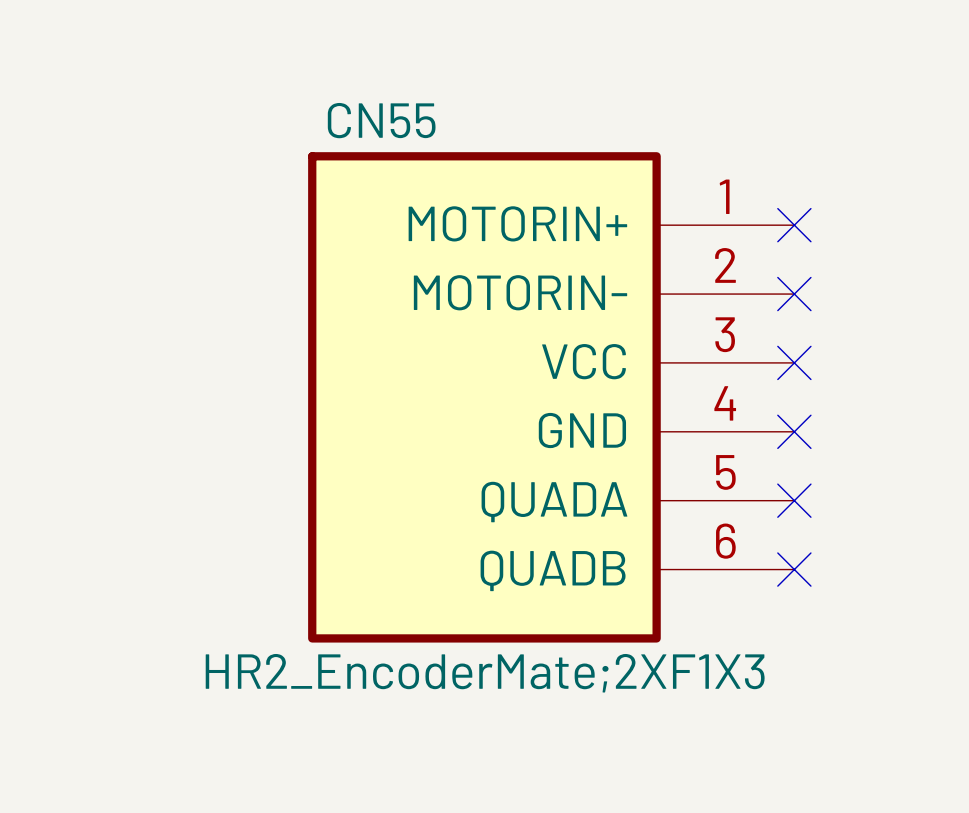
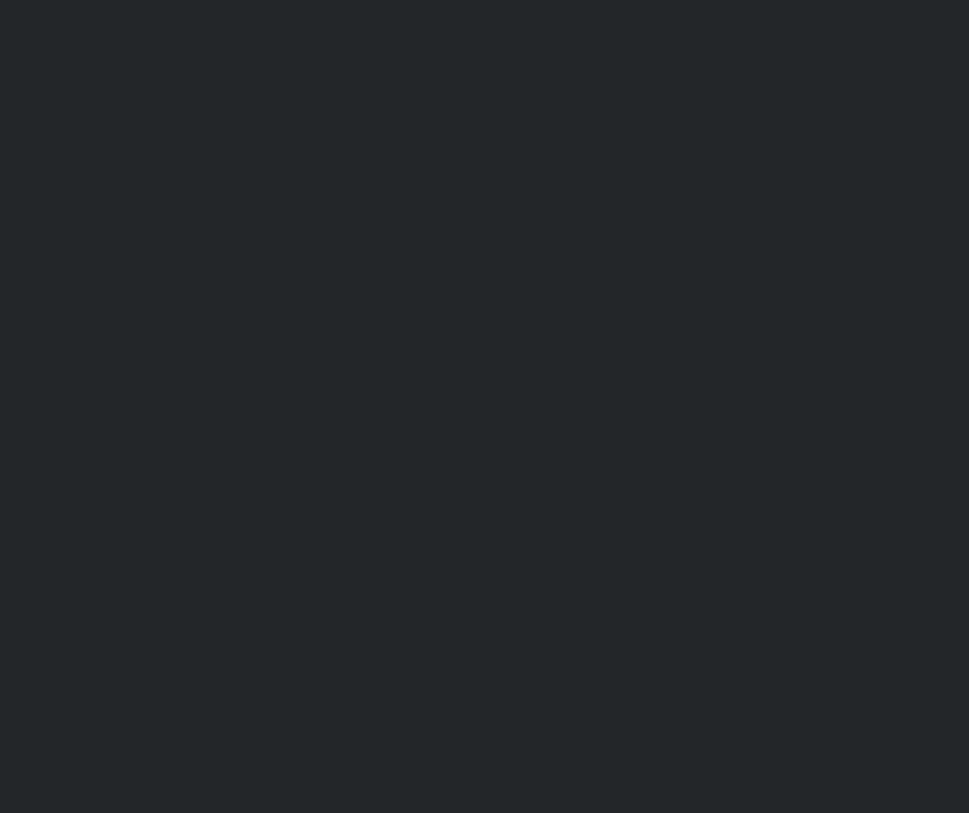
no-connect mark: (794, 225) -> none
no-connect mark: (794, 294) -> none
no-connect mark: (794, 362) -> none
CN55: HR2_EncoderMate;2XF1X3 (551, 397) -> none
no-connect mark: (794, 431) -> none
no-connect mark: (794, 500) -> none
no-connect mark: (794, 569) -> none

